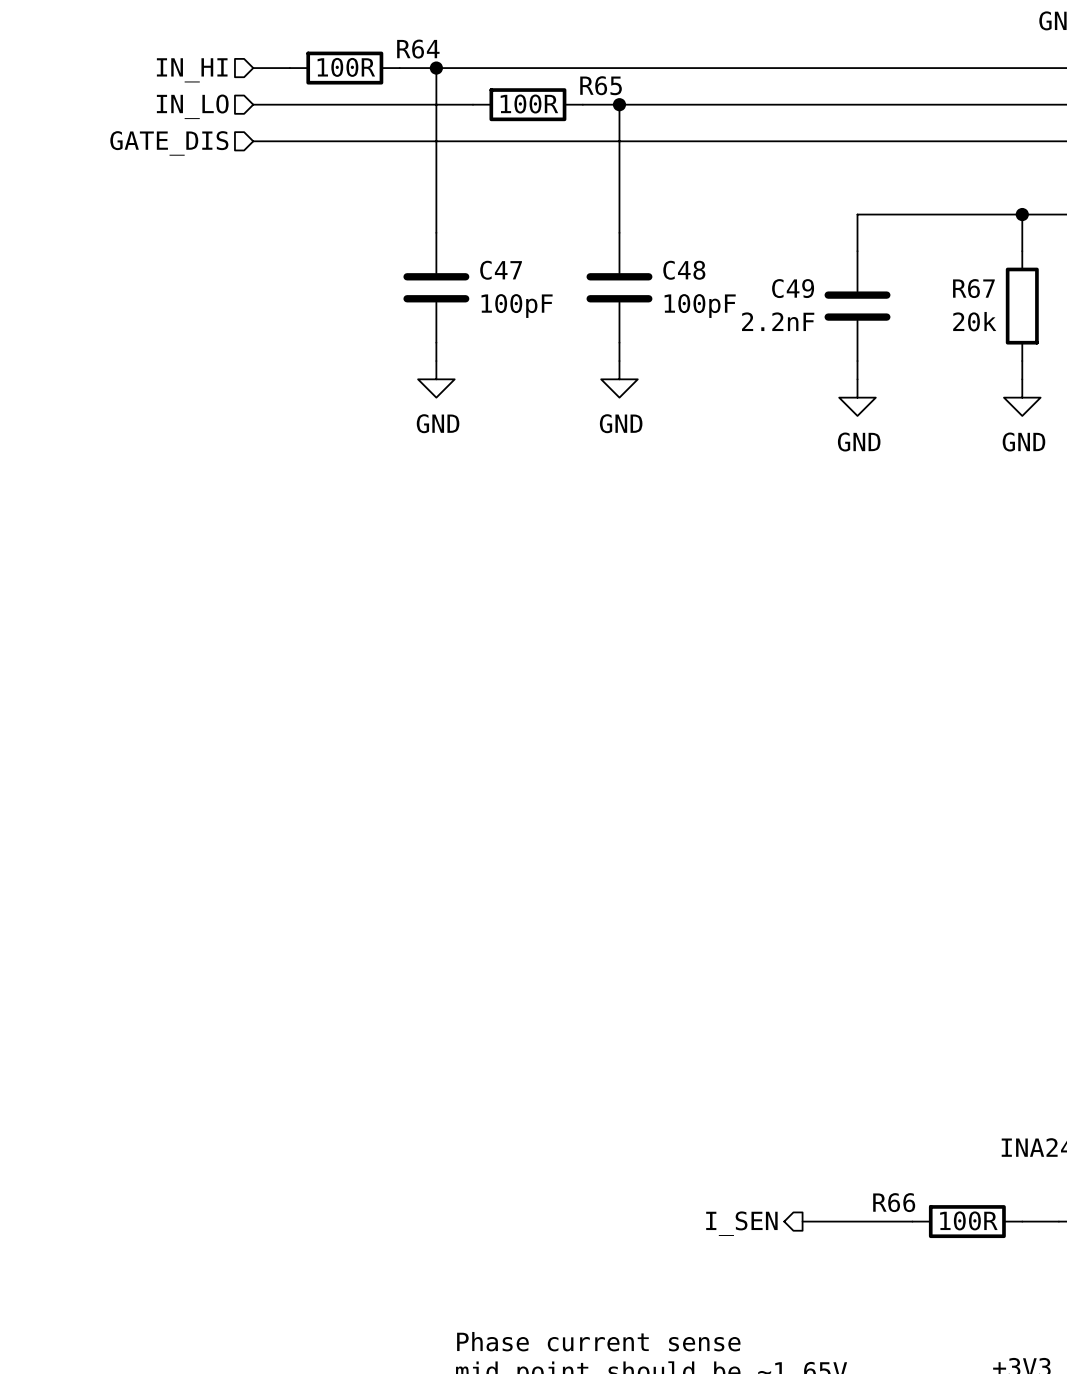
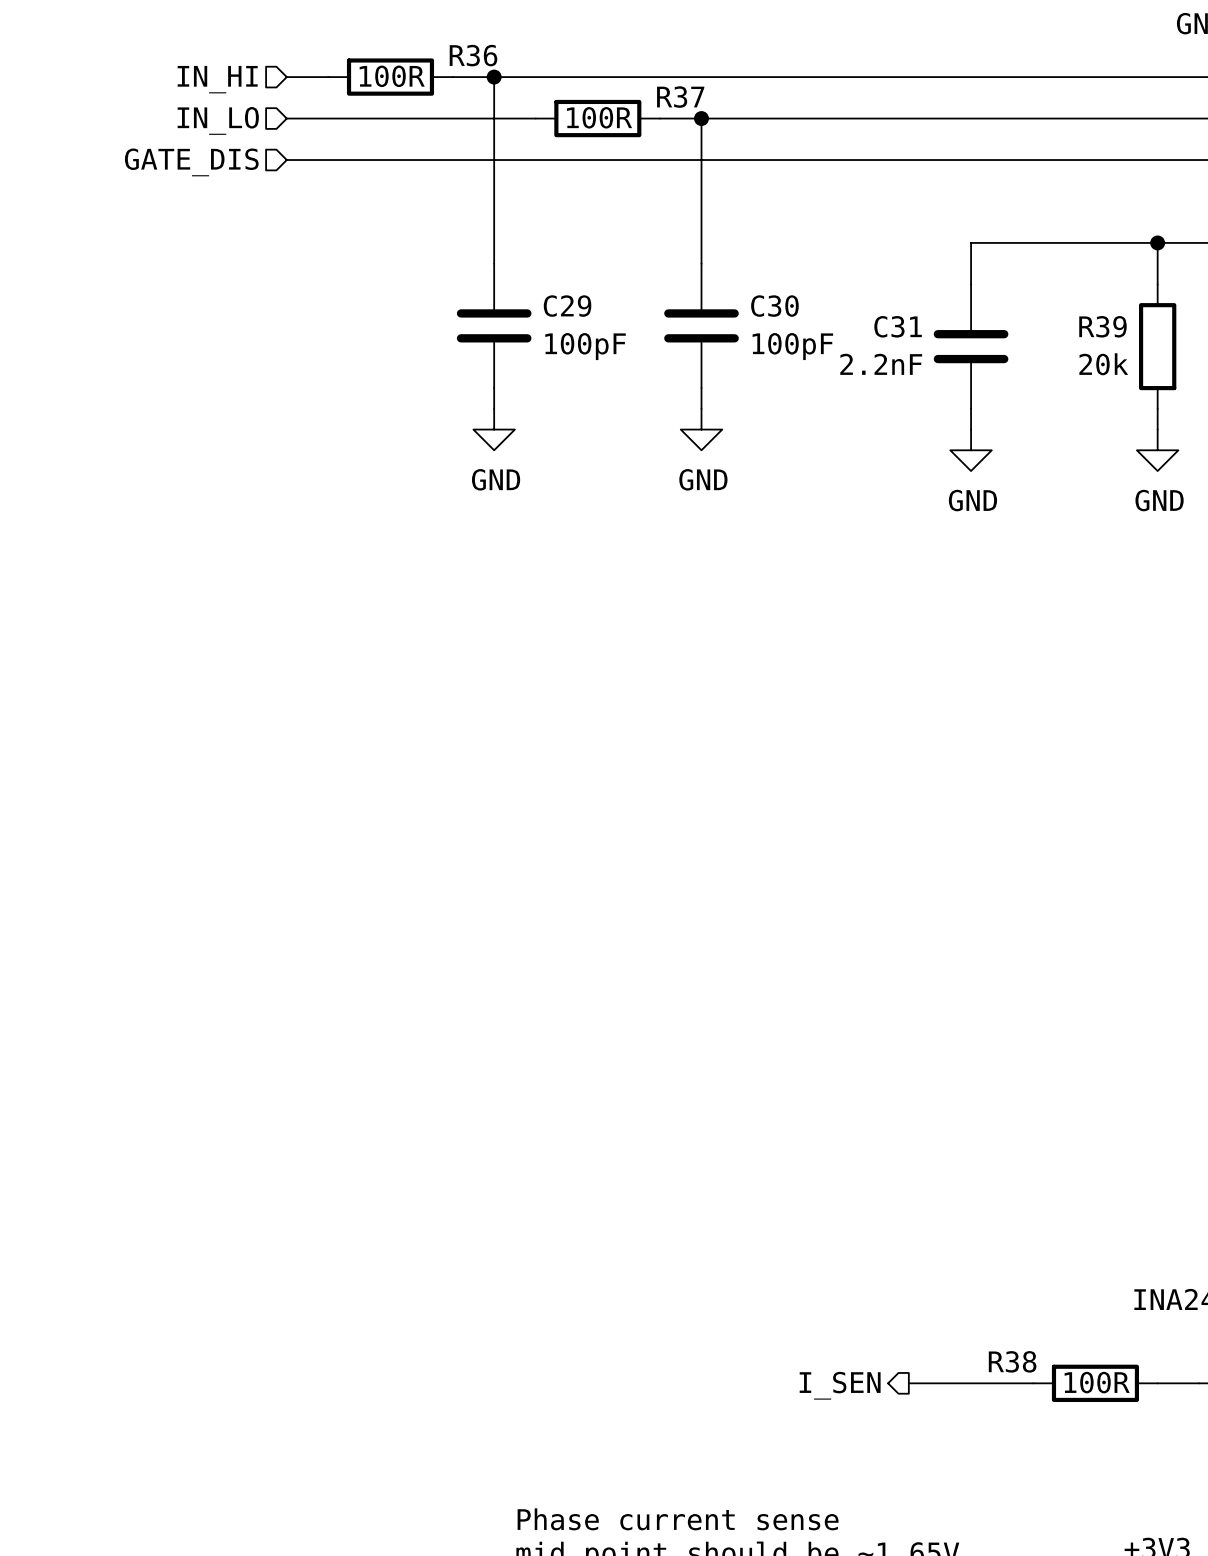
R64 name: R64 (418, 49) -> R36 (473, 55)
R65 name: R65 (601, 85) -> R37 (680, 97)
C47 name: C47 (501, 270) -> C29 (567, 306)
C48 name: C48 (684, 270) -> C30 (774, 306)
C49 name: C49 (793, 288) -> C31 (898, 326)
R67 name: R67 (973, 288) -> R39 (1102, 326)
R66 name: R66 (894, 1202) -> R38 (1012, 1361)

